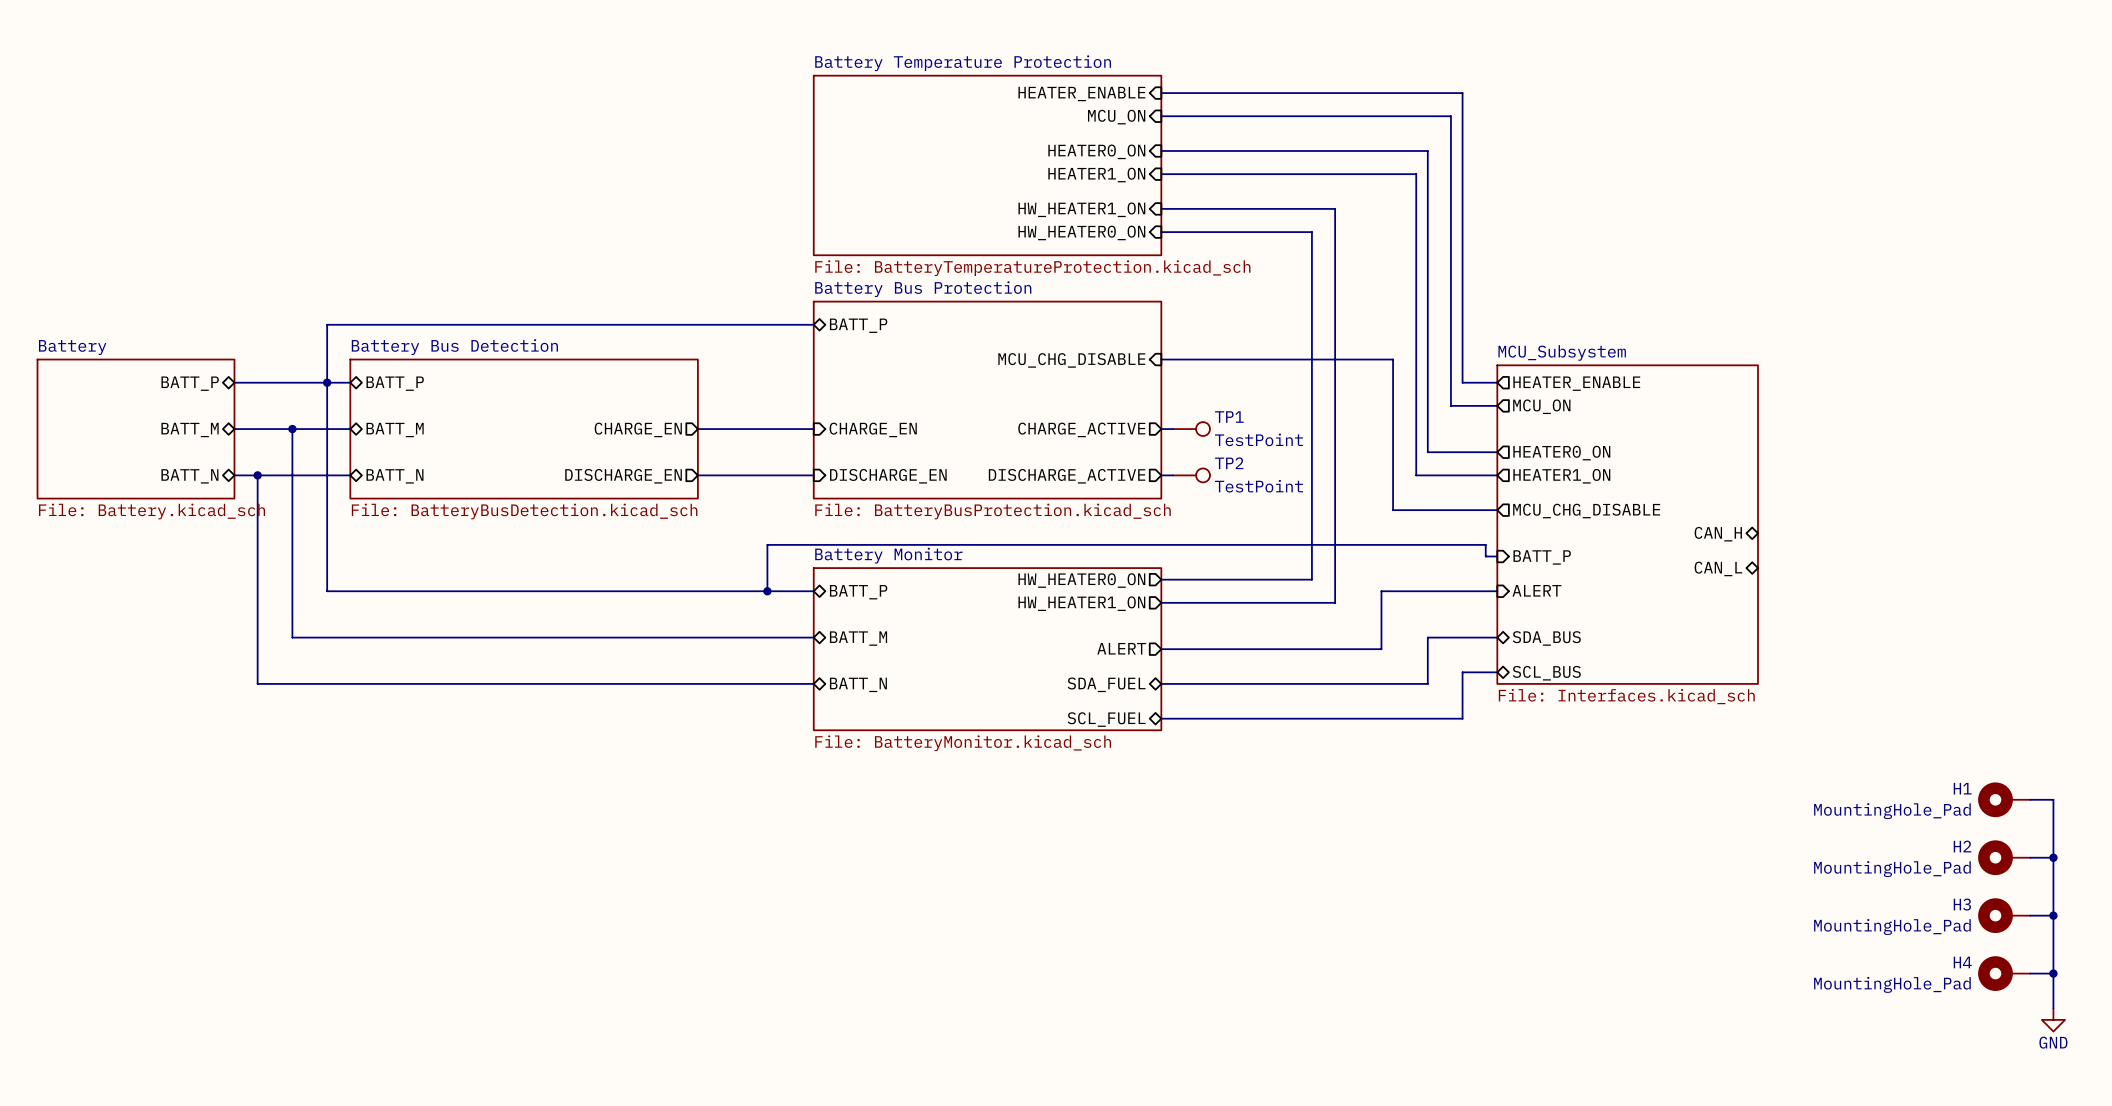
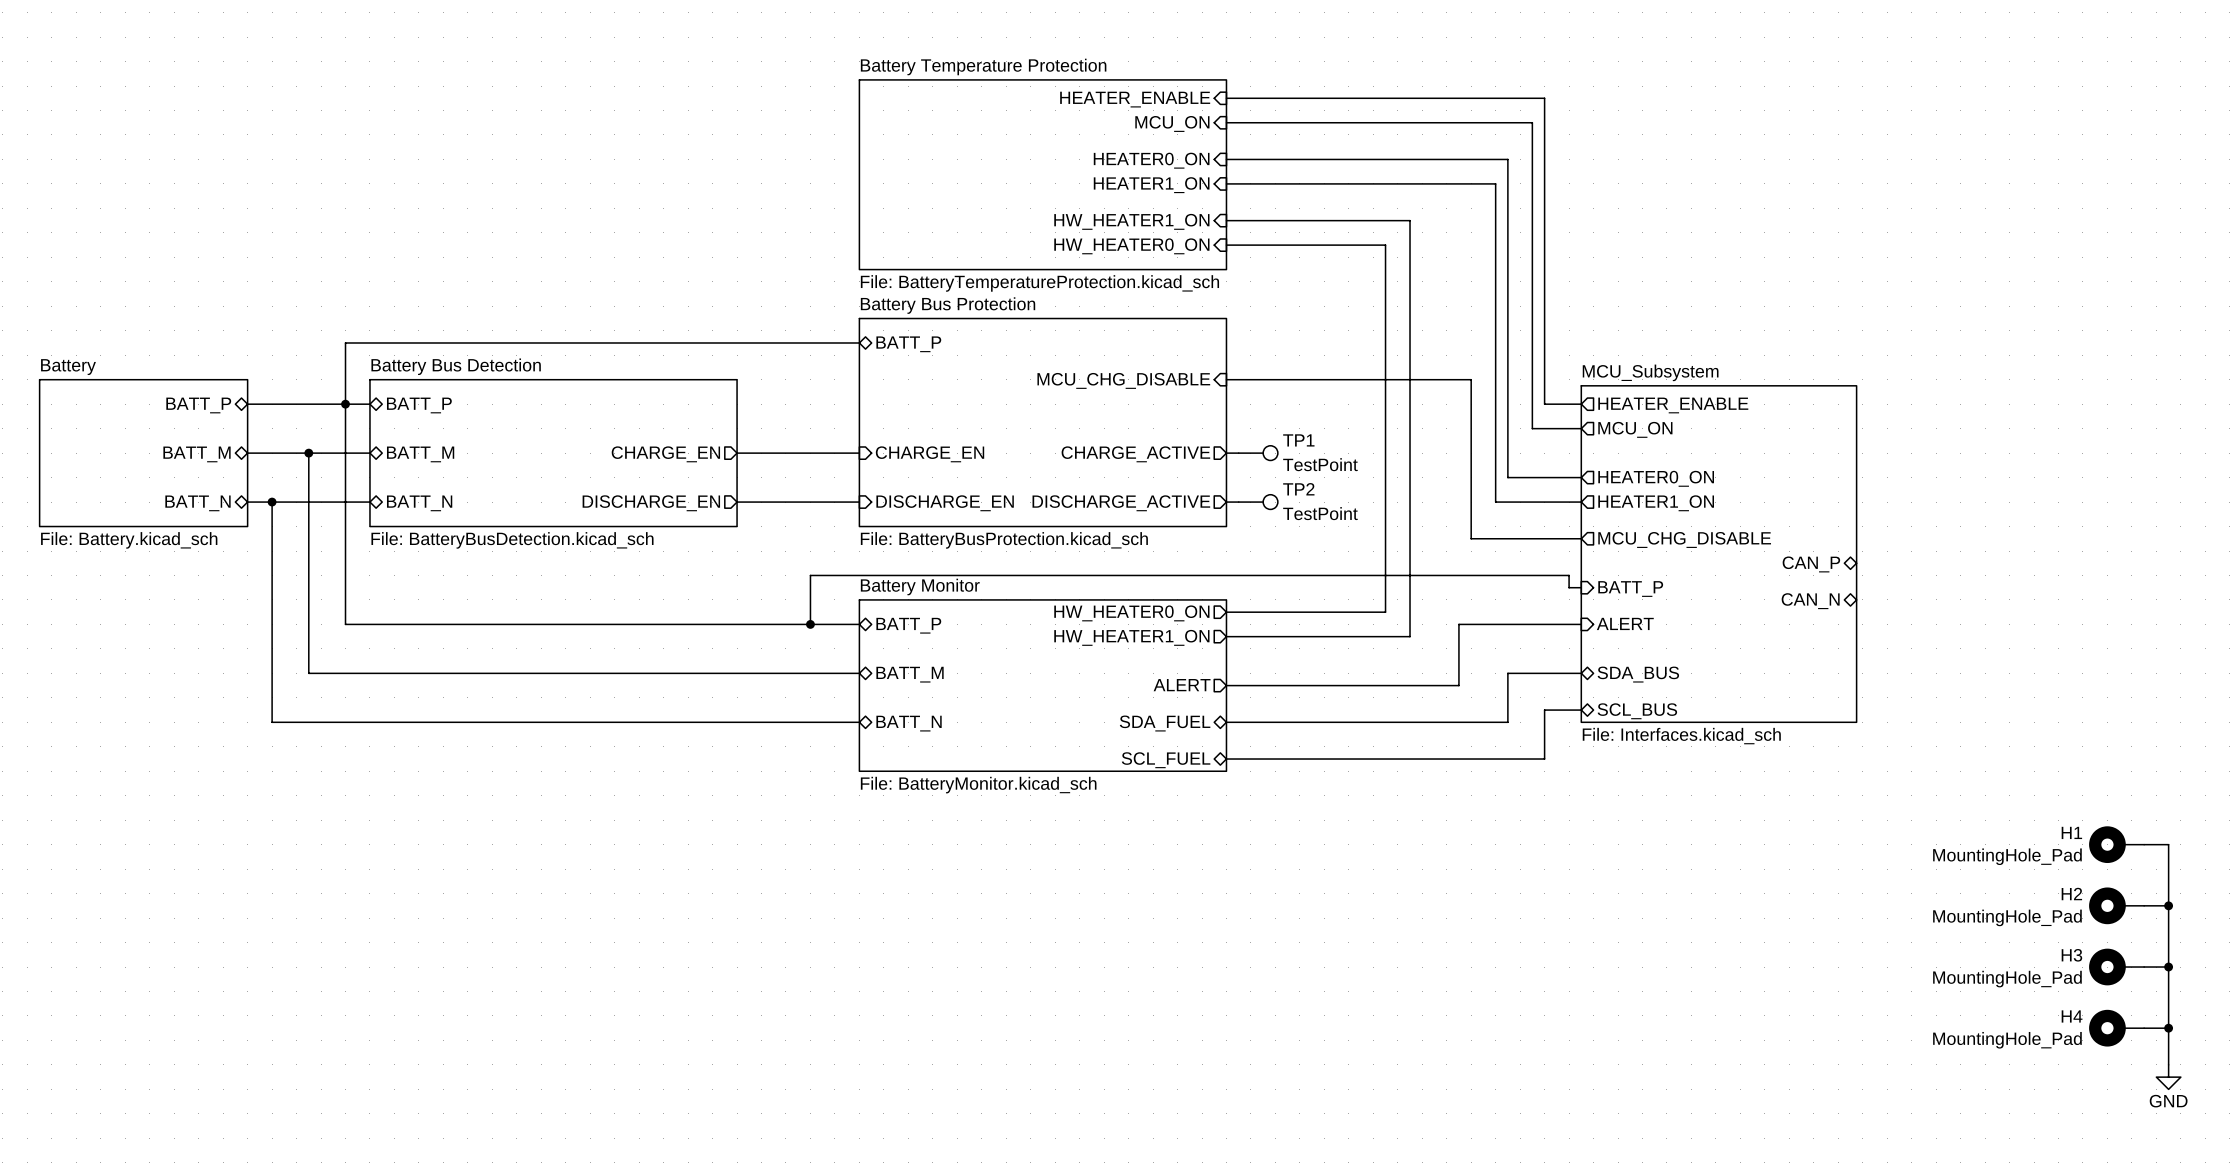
sheet pin: CAN_H (1718, 534) -> CAN_P (1811, 564)
sheet pin: CAN_L (1718, 568) -> CAN_N (1810, 601)

